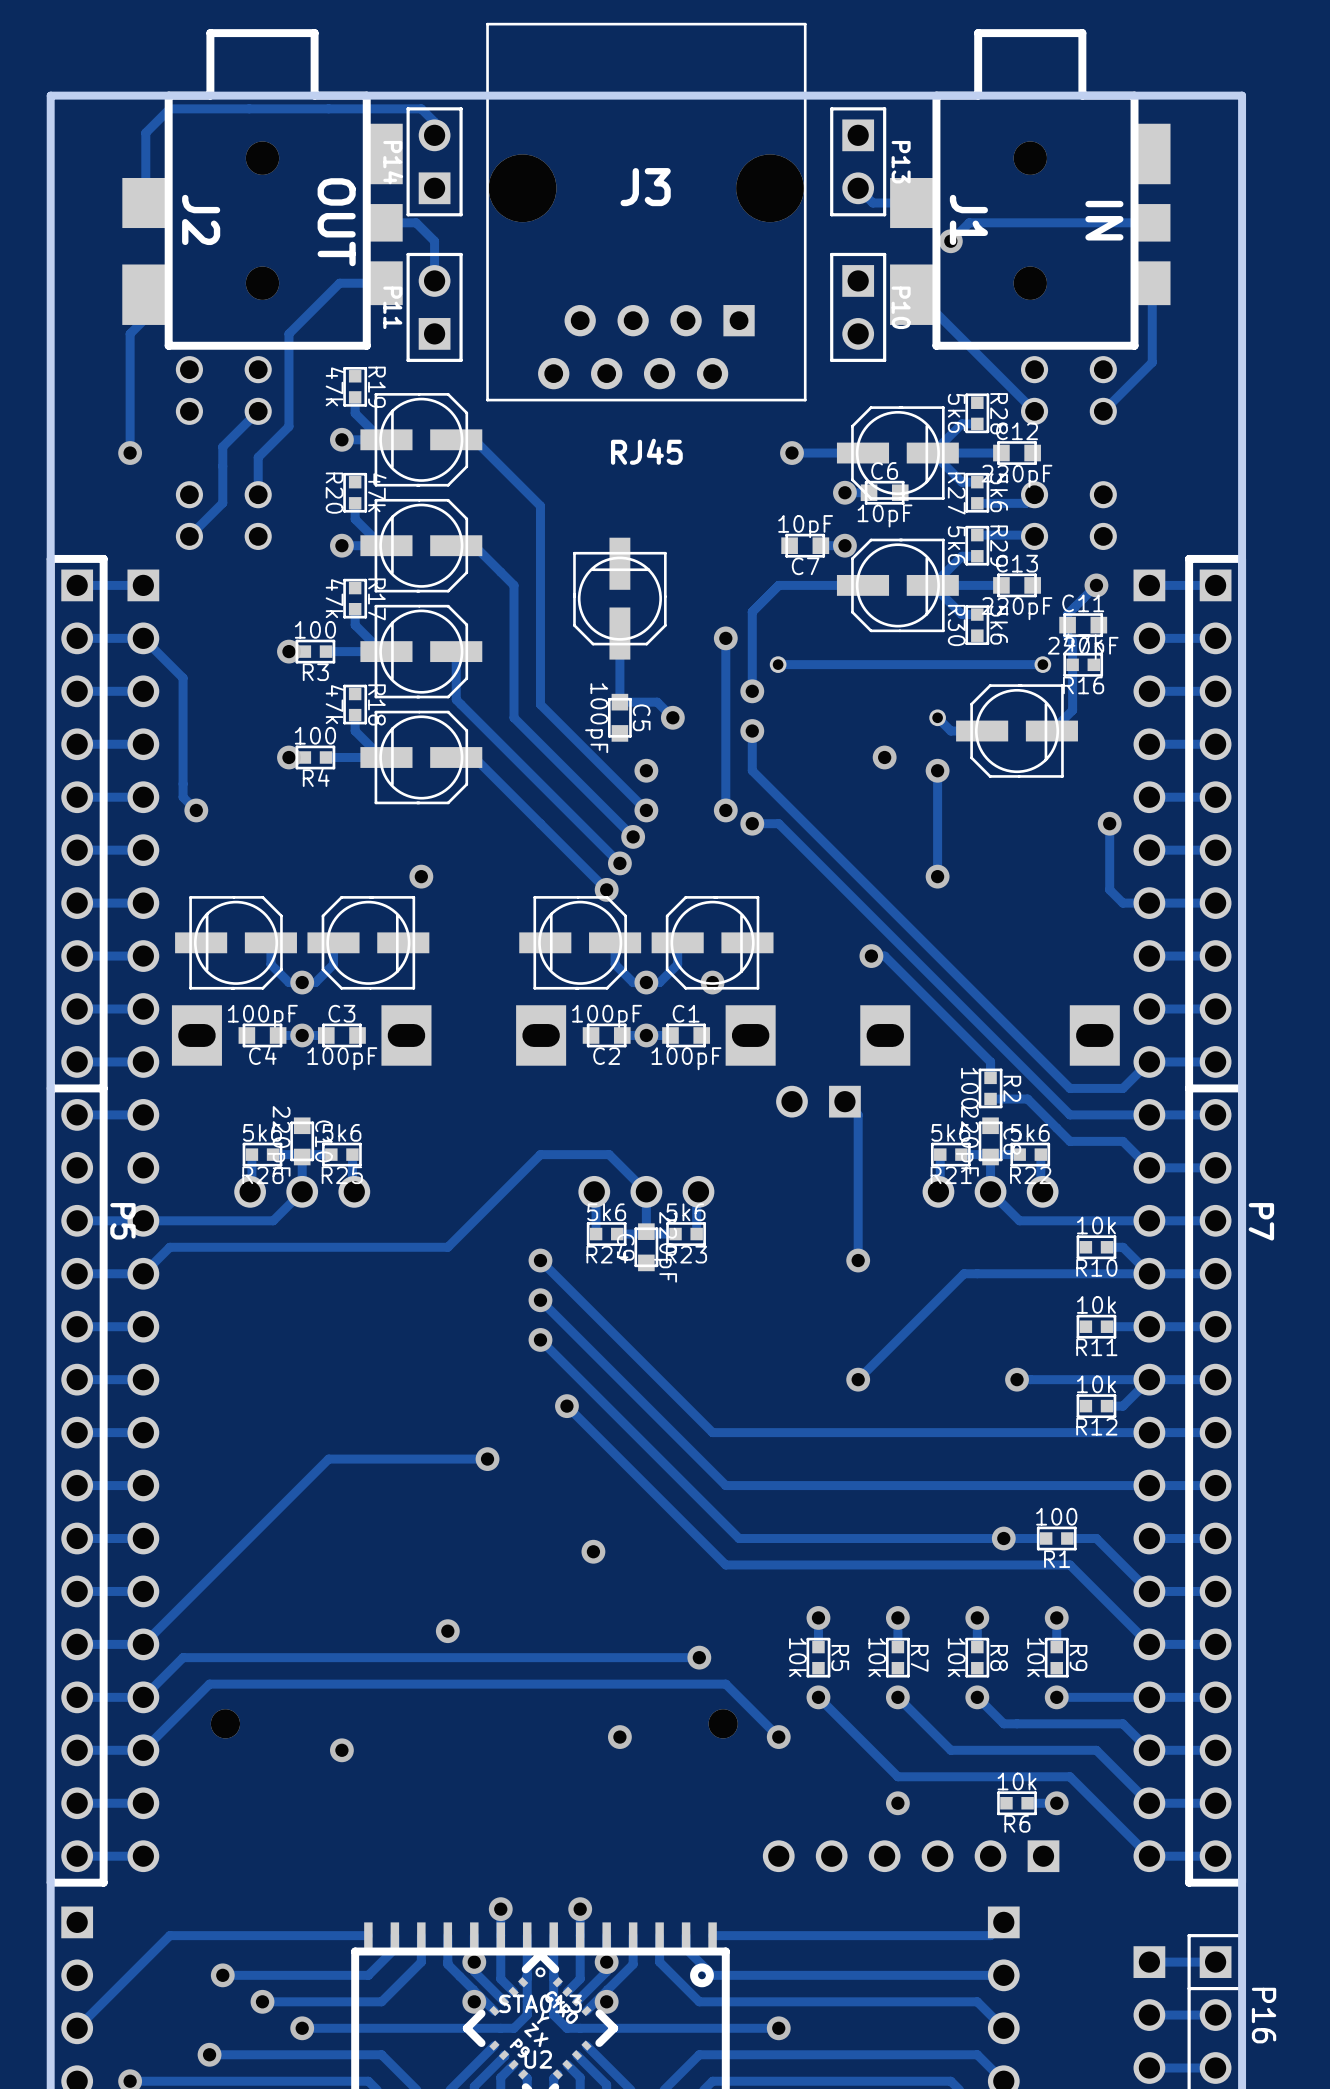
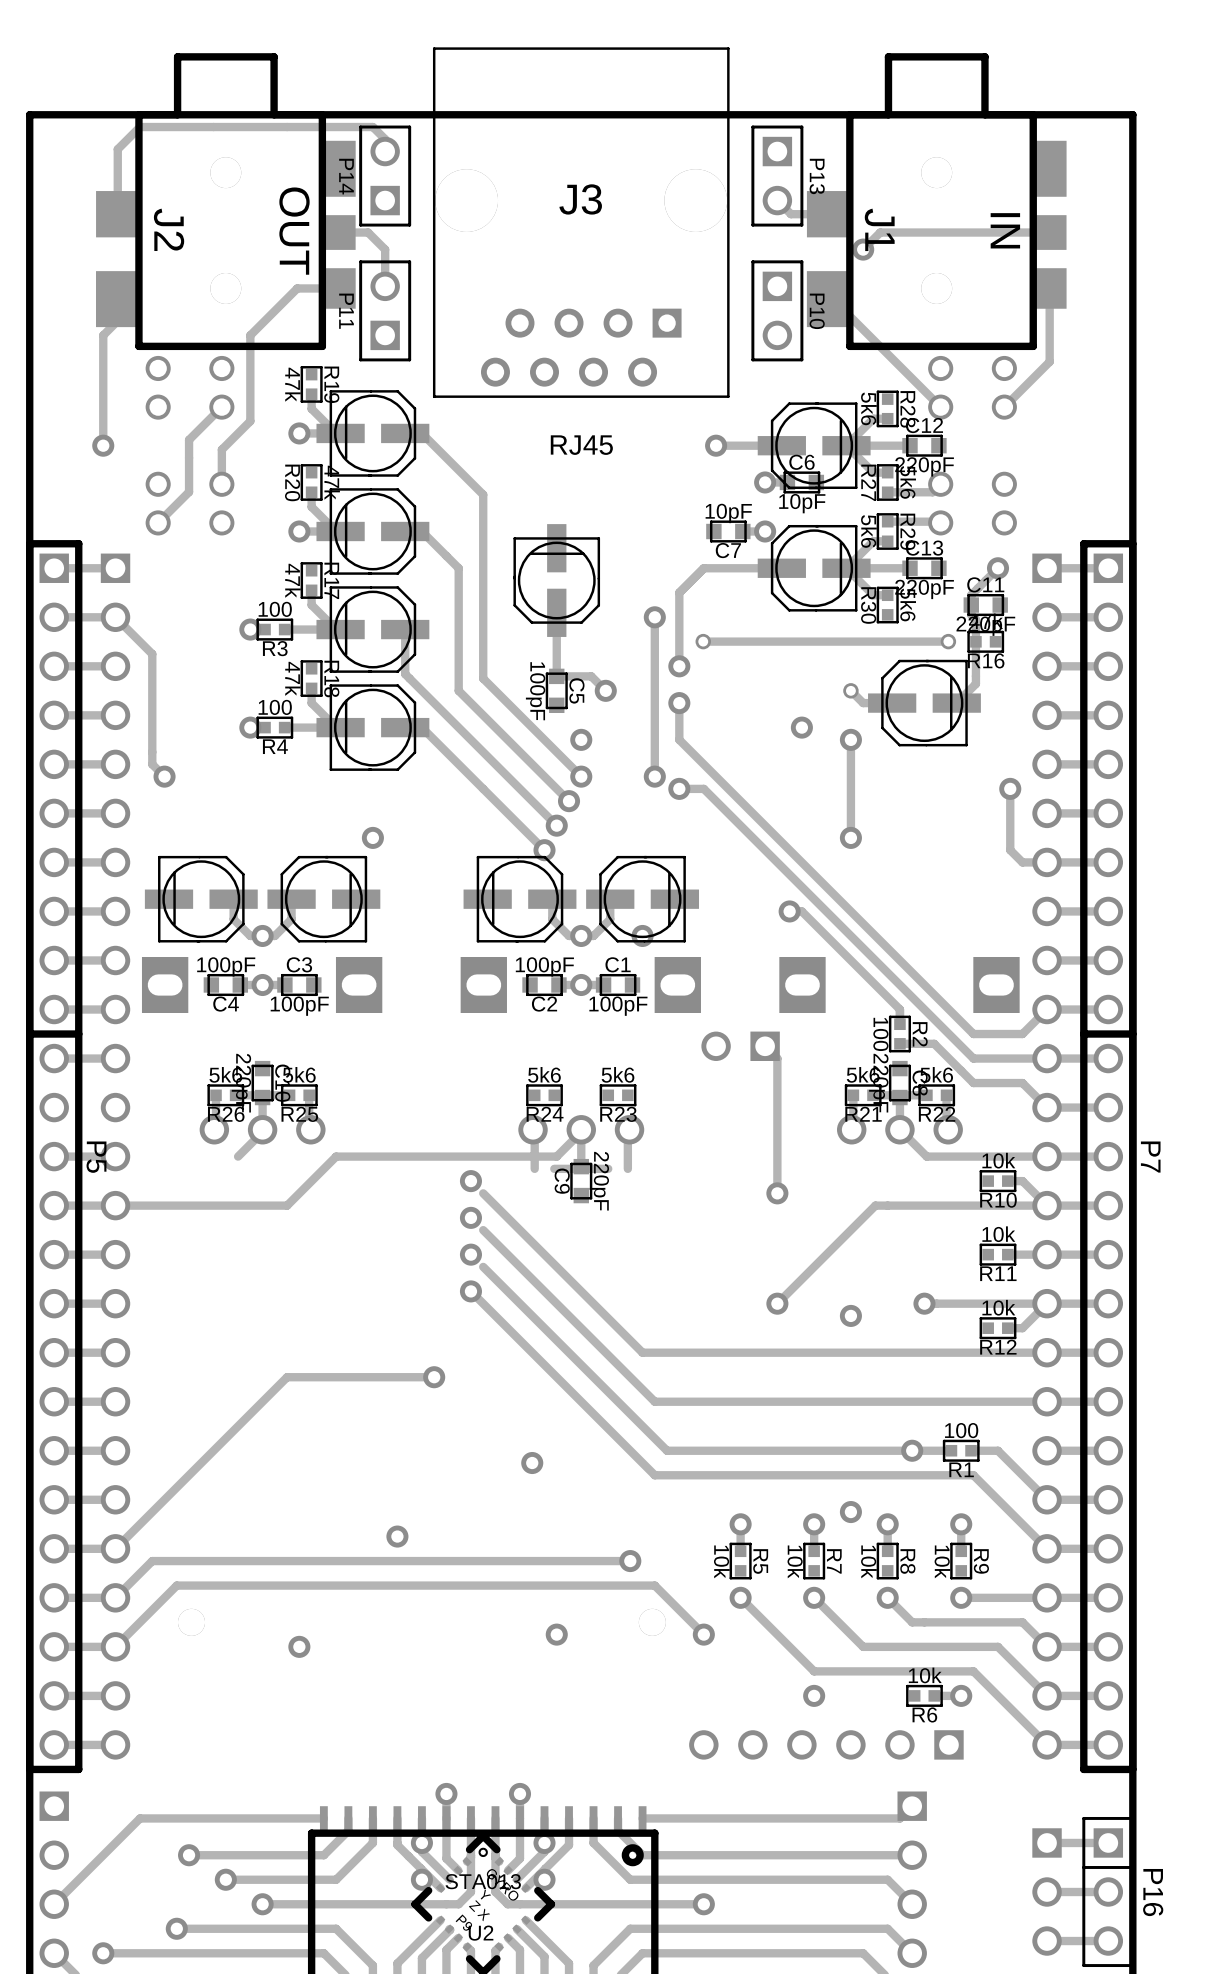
track: (302, 1191) (273, 1220) (143, 1220) -> (262, 1129) (262, 1132) (238, 1156)
track: (646, 1191) (609, 1154) (540, 1154) (447, 1247) (169, 1247) (143, 1273) -> (581, 1132) (556, 1156) (336, 1156) (287, 1205) (115, 1205)
R24 position: (606, 1234) -> (544, 1095)
R23 position: (686, 1234) -> (618, 1095)
via position: (540, 1260) -> (470, 1181)
via position: (540, 1300) -> (470, 1217)
via position: (540, 1339) -> (470, 1254)
track: none -> (470, 1291) (507, 1328)
via: none -> (470, 1291)
via: none -> (850, 1315)
via: (566, 1406) -> none
via: none -> (850, 1512)

